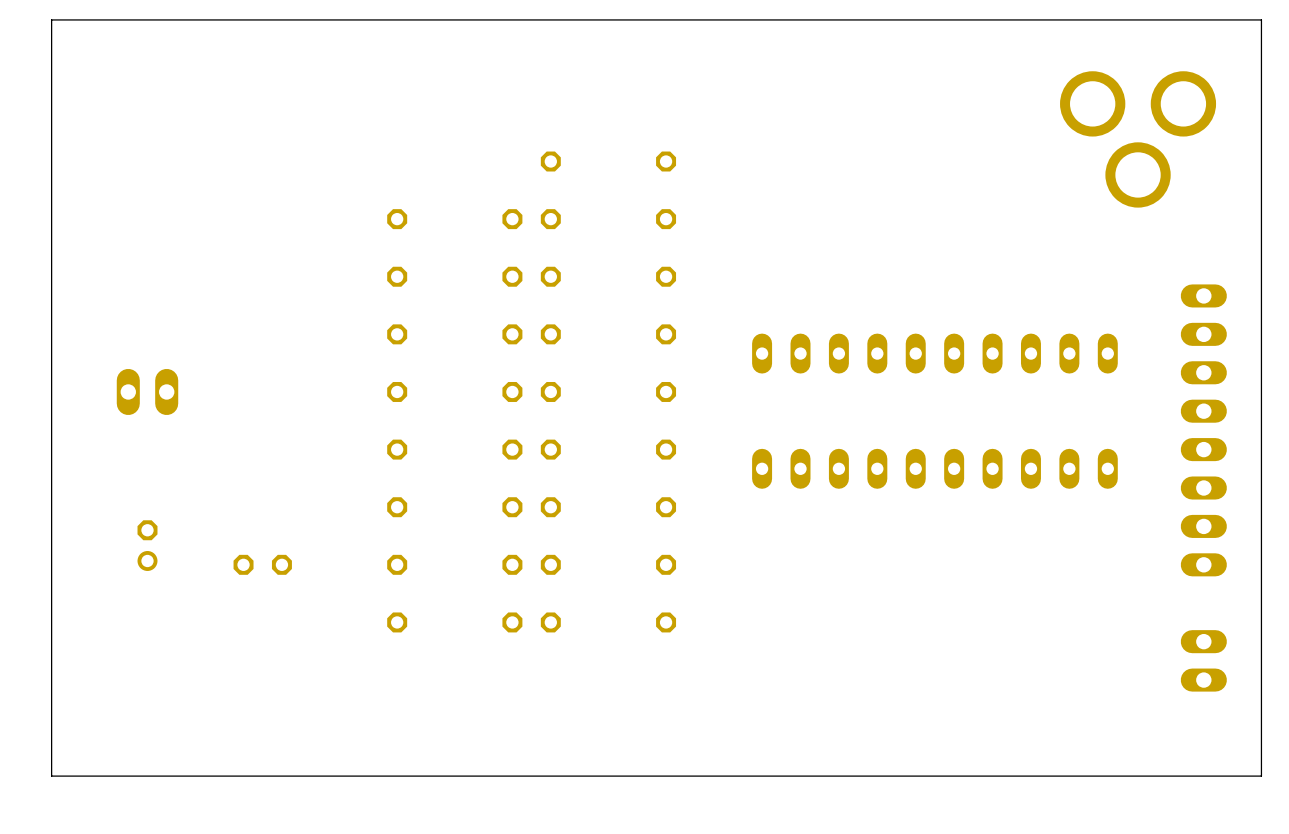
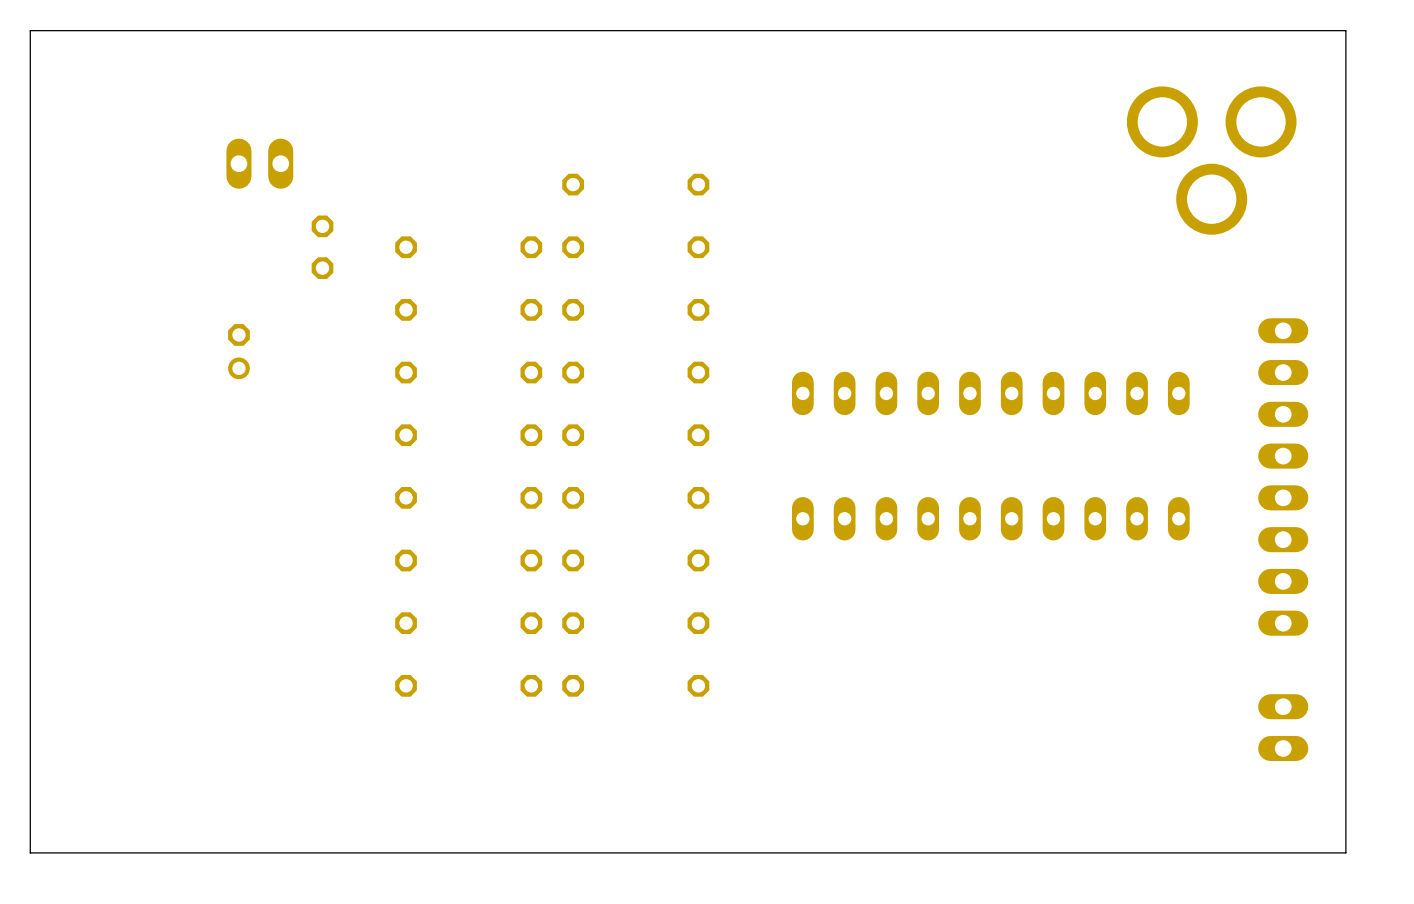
part position: (147, 391) -> (259, 163)
part position: (147, 545) -> (238, 351)
part rotation: 0° (262, 564) -> 90° clockwise (322, 247)
part position: (262, 564) -> (322, 247)

